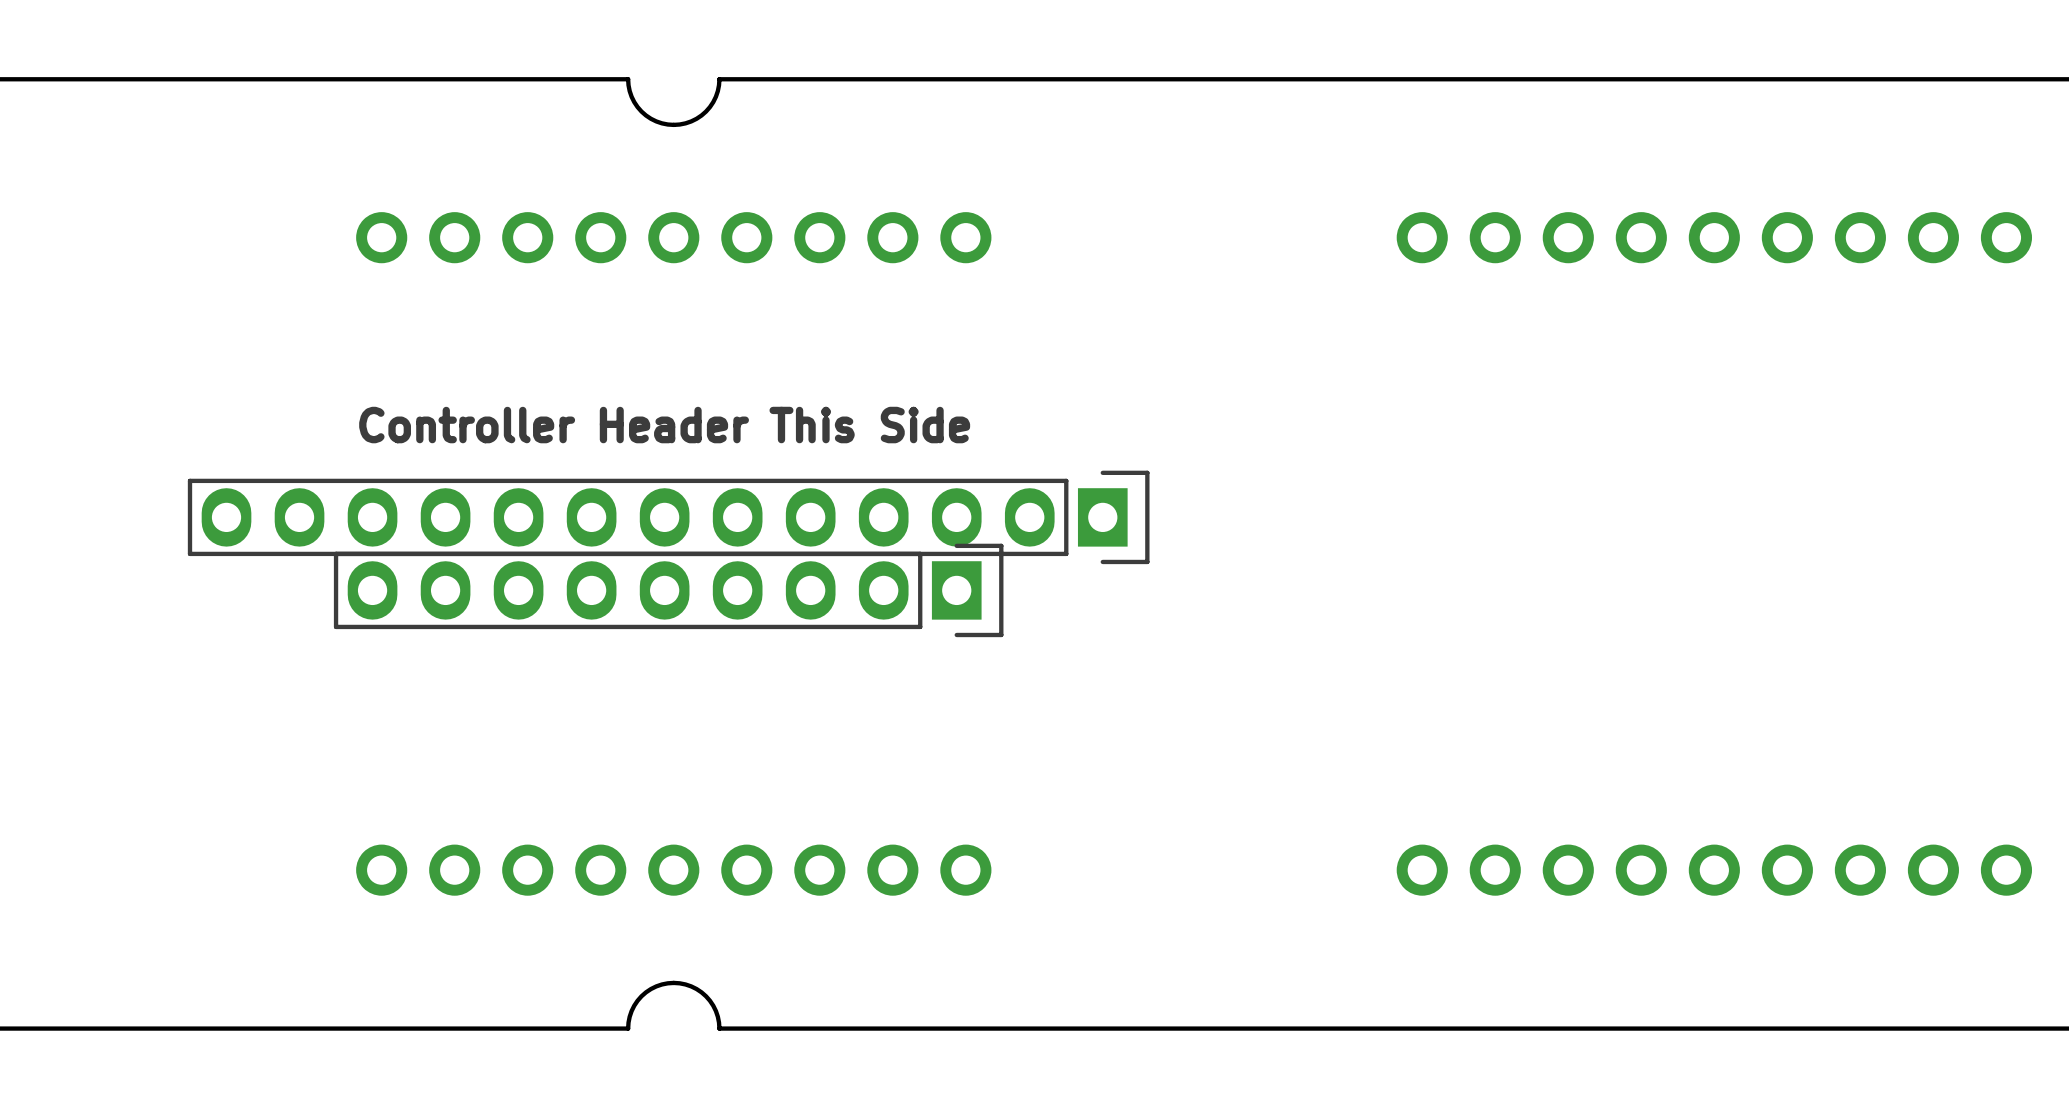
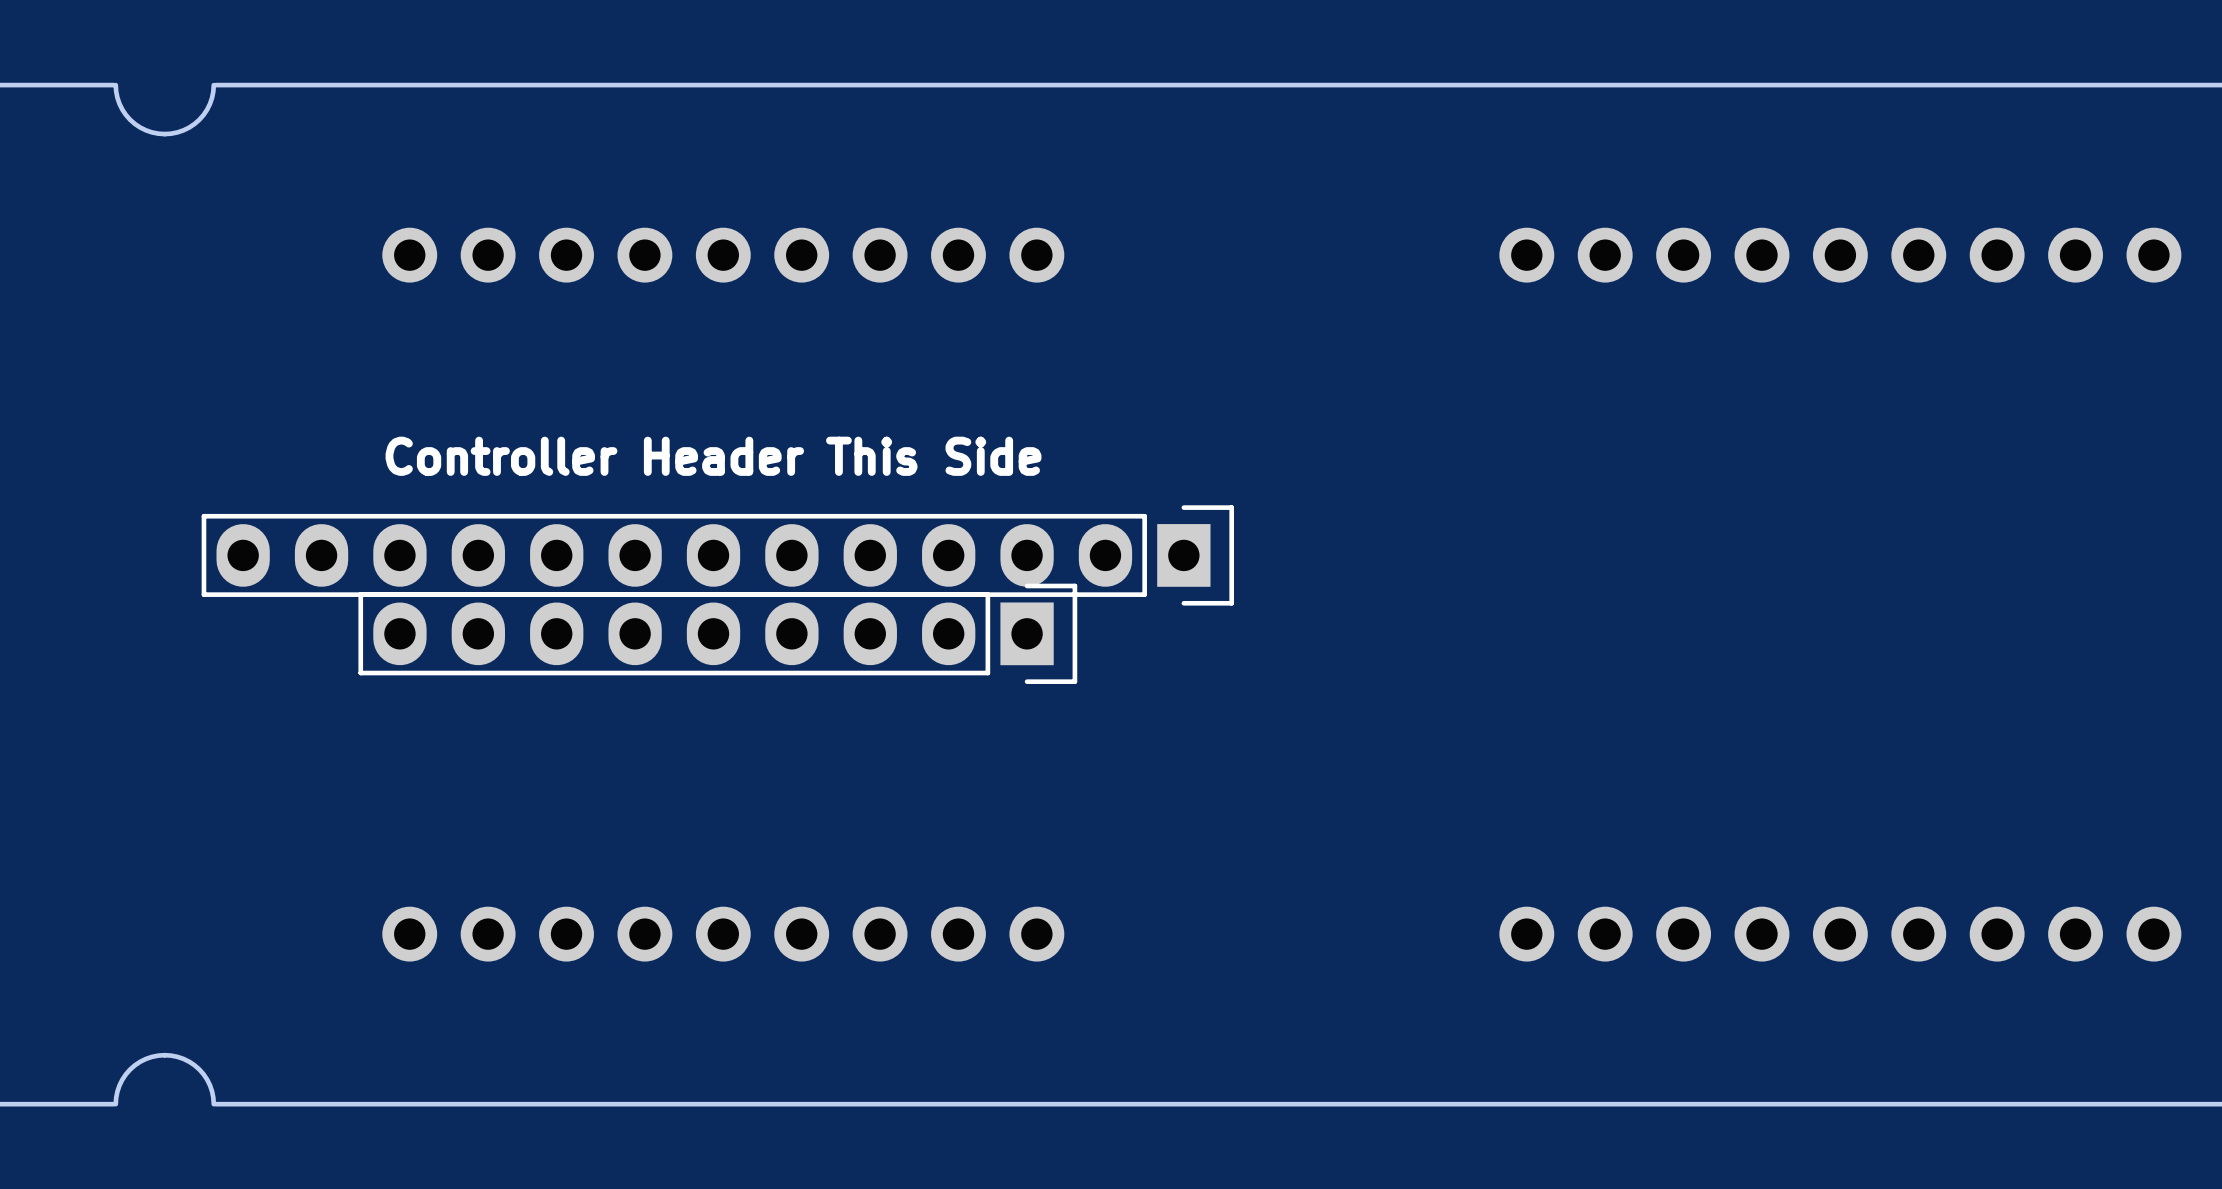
board edge: none -> (213, 85) (210, 103) (199, 119) (183, 130) (164, 134) (146, 130) (130, 119) (119, 103) (115, 85)
board edge: (200, 79) (106, 79) -> none
board edge: (719, 79) (715, 96) (706, 111) (691, 121) (673, 124) (656, 121) (641, 111) (631, 96) (628, 79) -> (772, 85) (674, 85)
board edge: none -> (213, 1104) (210, 1085) (199, 1069) (183, 1058) (164, 1055) (146, 1058) (130, 1069) (119, 1085) (115, 1104)
board edge: (200, 1028) (106, 1028) -> none
board edge: (719, 1028) (715, 1011) (706, 996) (691, 986) (673, 982) (656, 986) (641, 996) (631, 1011) (628, 1028) -> (772, 1104) (674, 1104)

